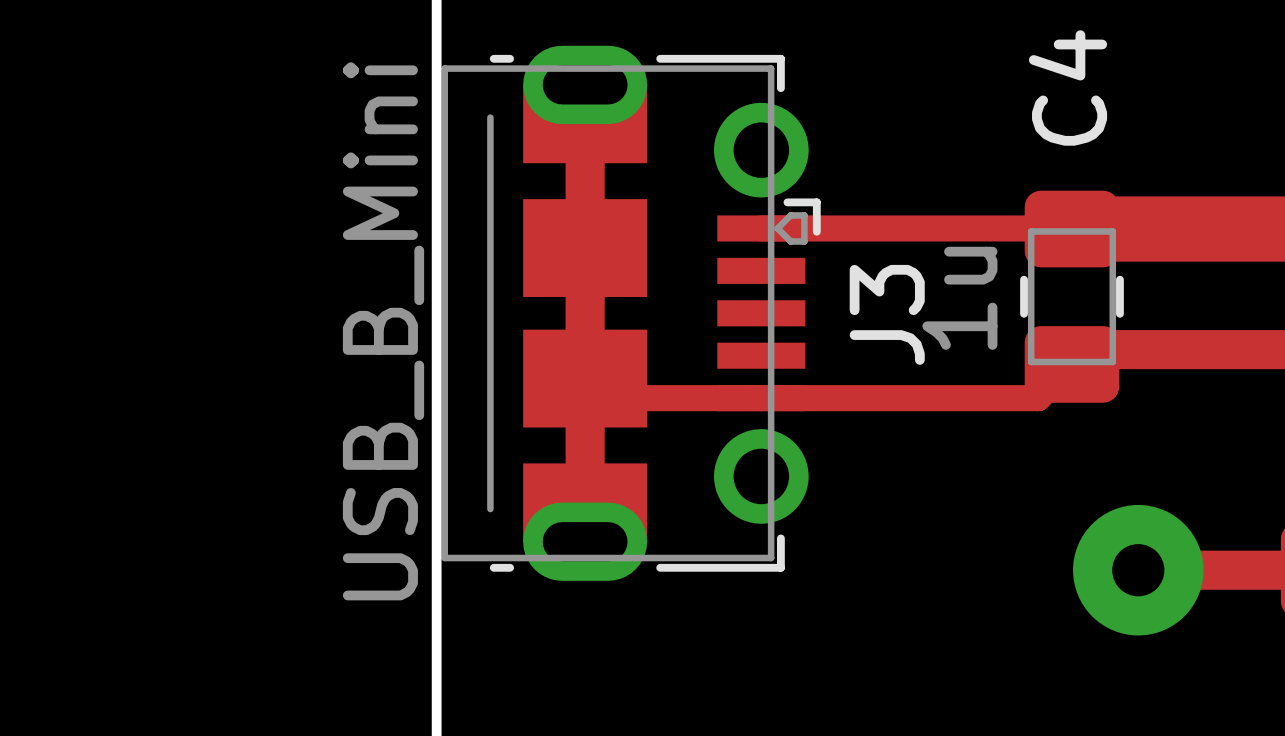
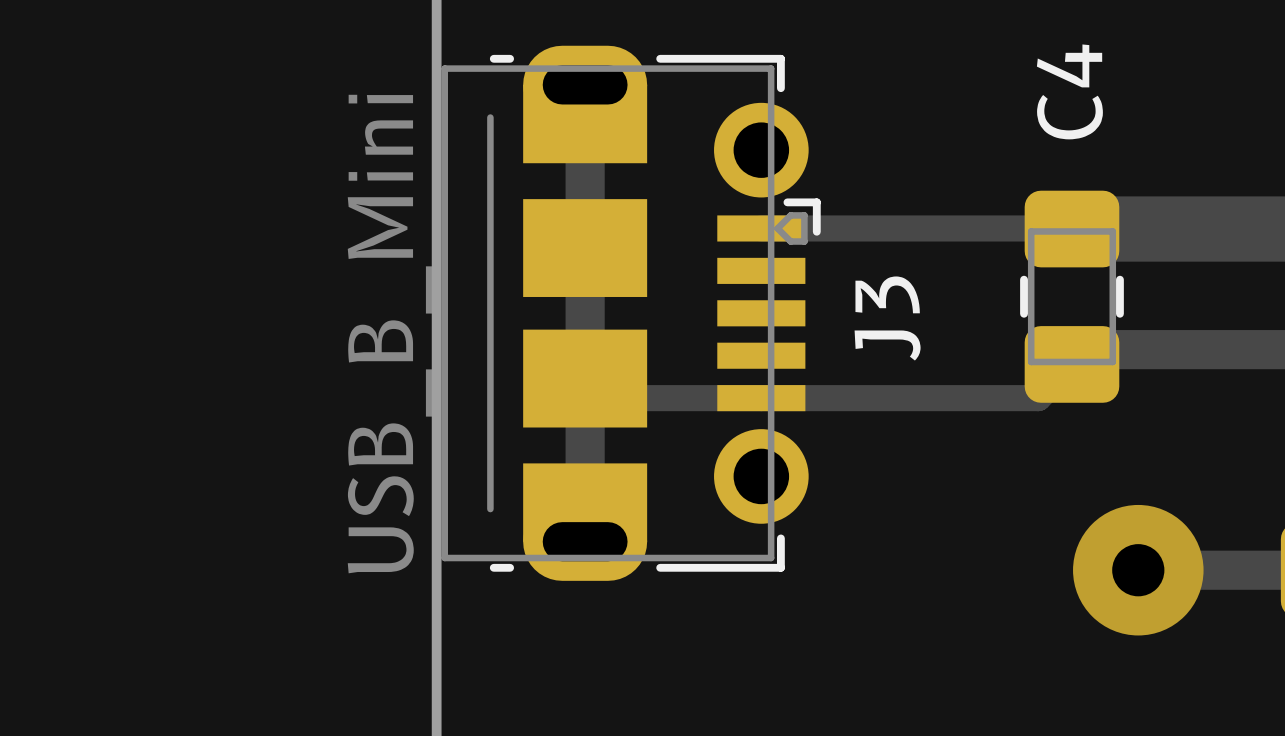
C4 value: 1u (959, 298) -> none

